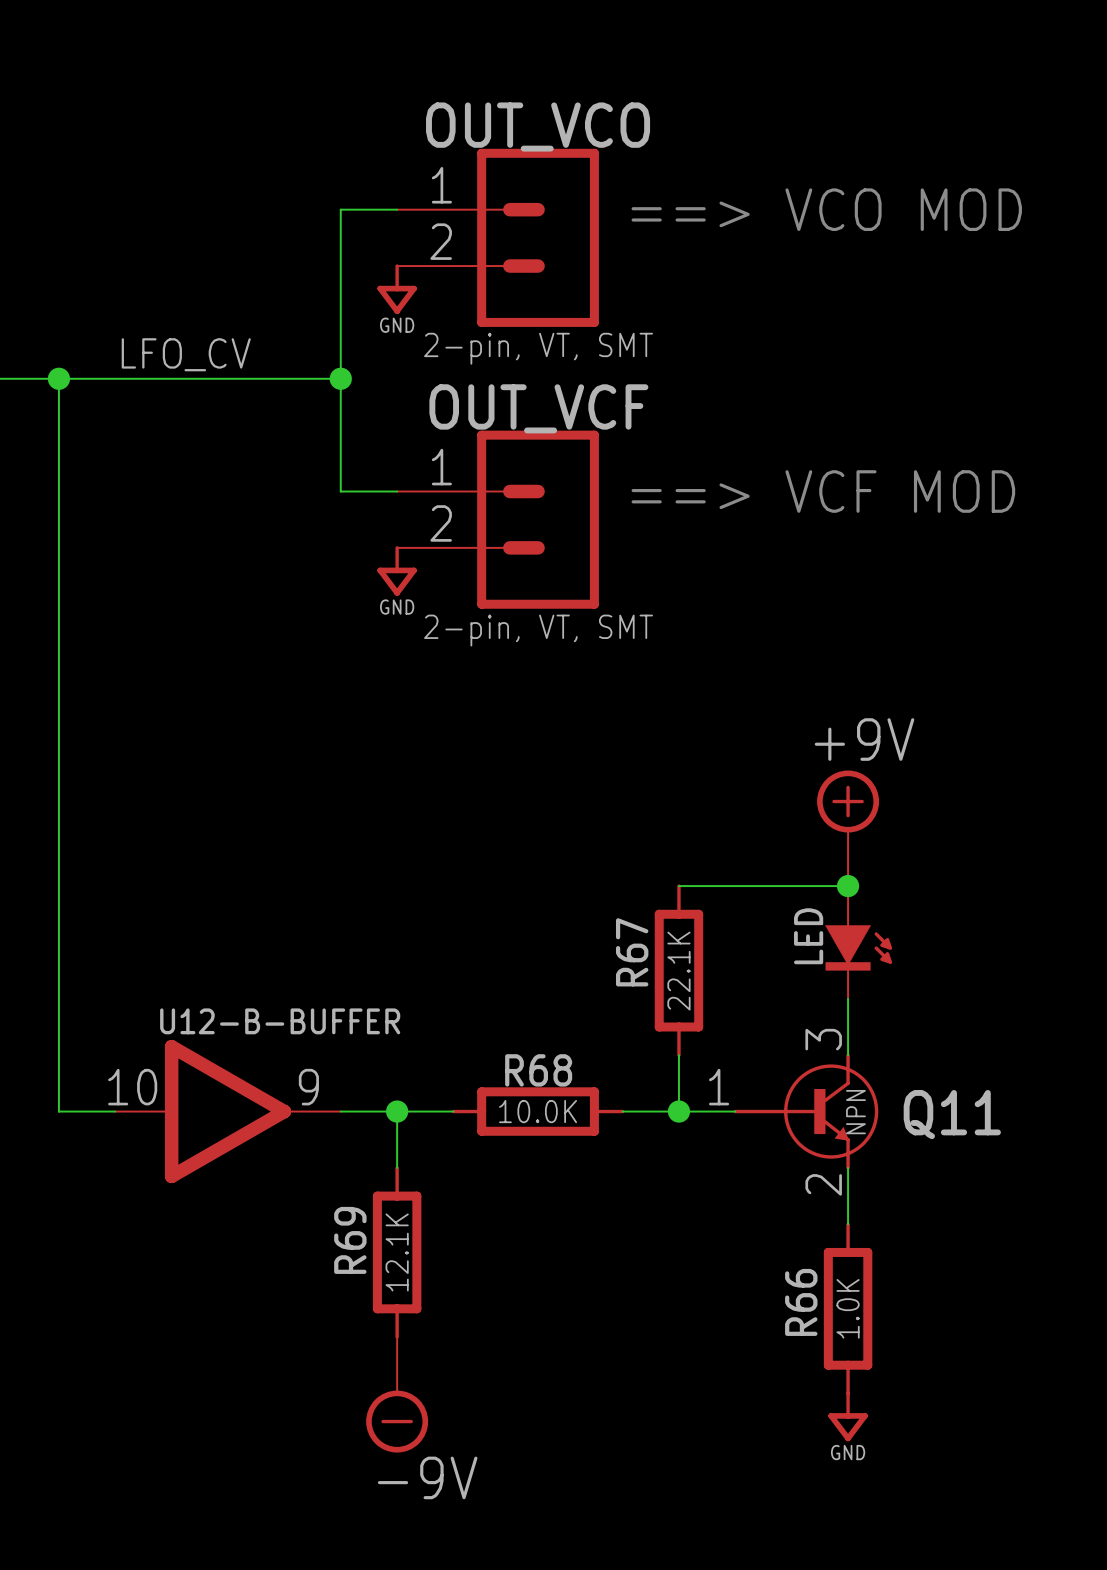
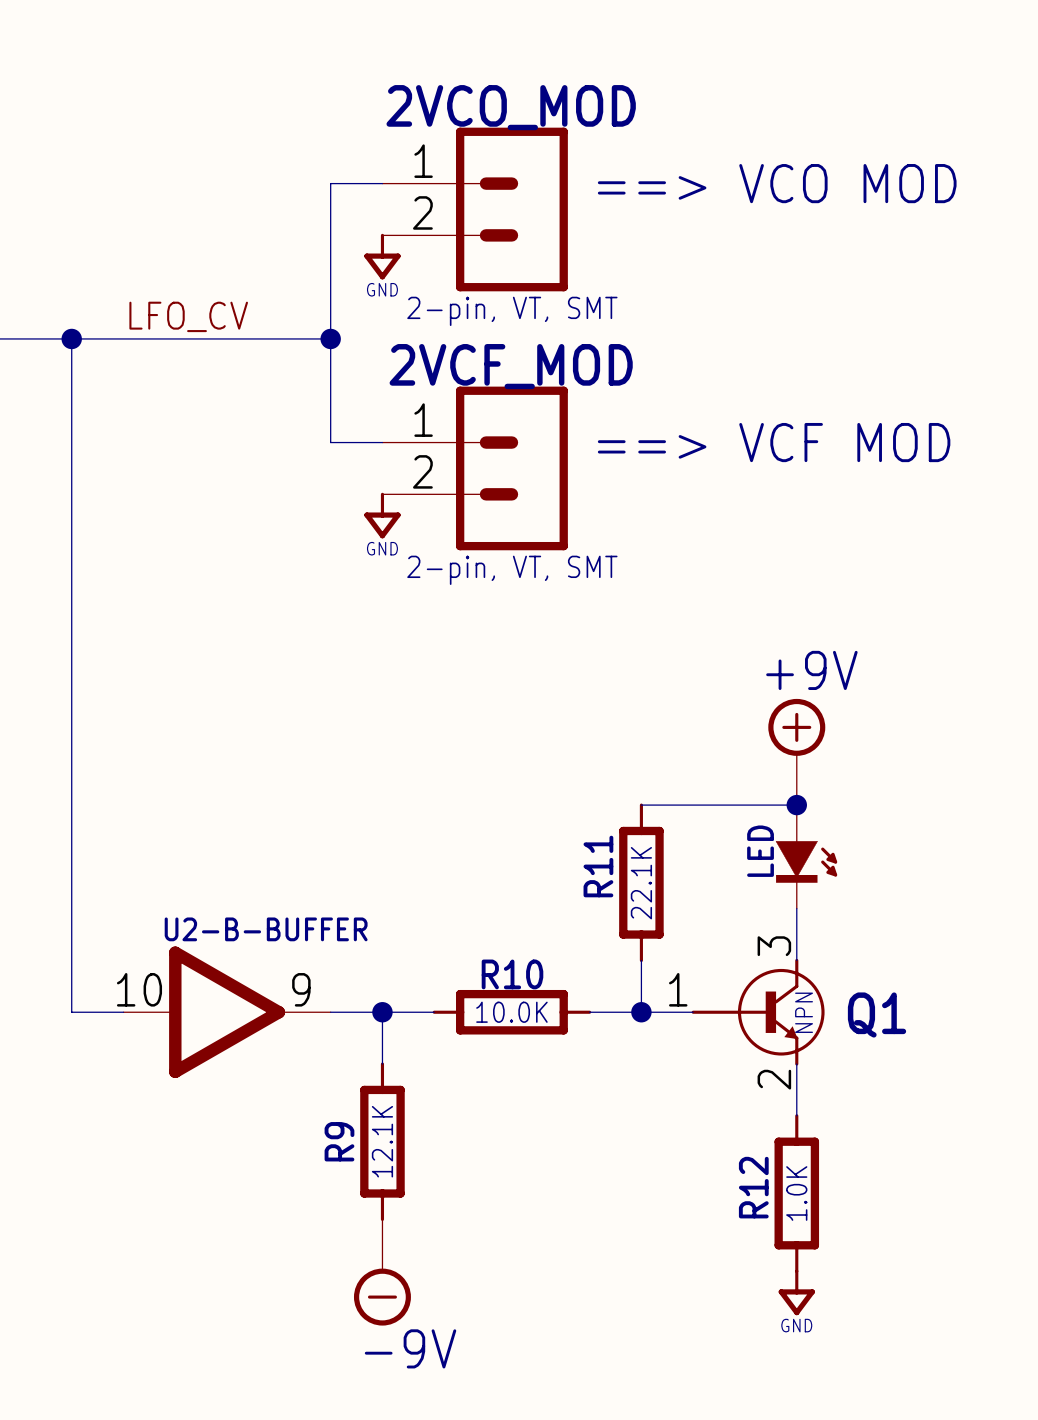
OUT_VCO name: OUT_VCO (538, 127) -> 2VCO_MOD (511, 107)
OUT_VCF name: OUT_VCF (538, 408) -> 2VCF_MOD (511, 366)
R67 name: R67 (632, 952) -> R11 (598, 866)
U12-B-BUFFER name: U12-B-BUFFER (280, 1021) -> U2-B-BUFFER (266, 929)
R68 name: R68 (538, 1070) -> R10 (512, 974)
Q11 name: Q11 (952, 1114) -> Q1 (877, 1015)
R69 name: R69 (350, 1240) -> R9 (339, 1141)
R66 name: R66 (801, 1302) -> R12 (753, 1187)

